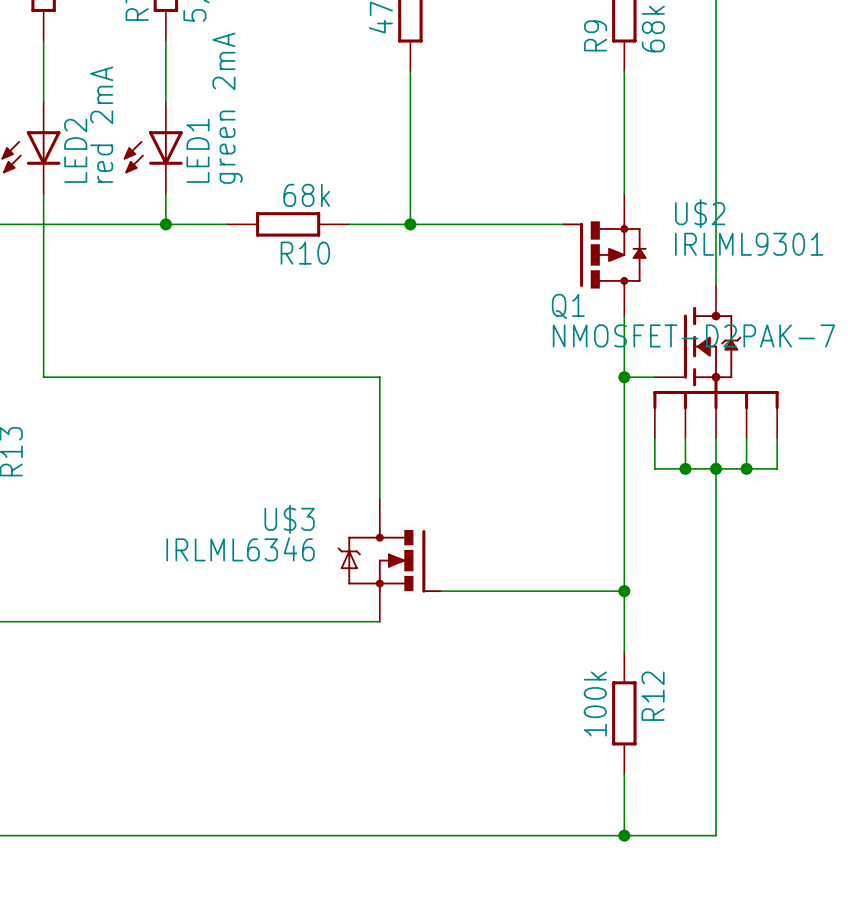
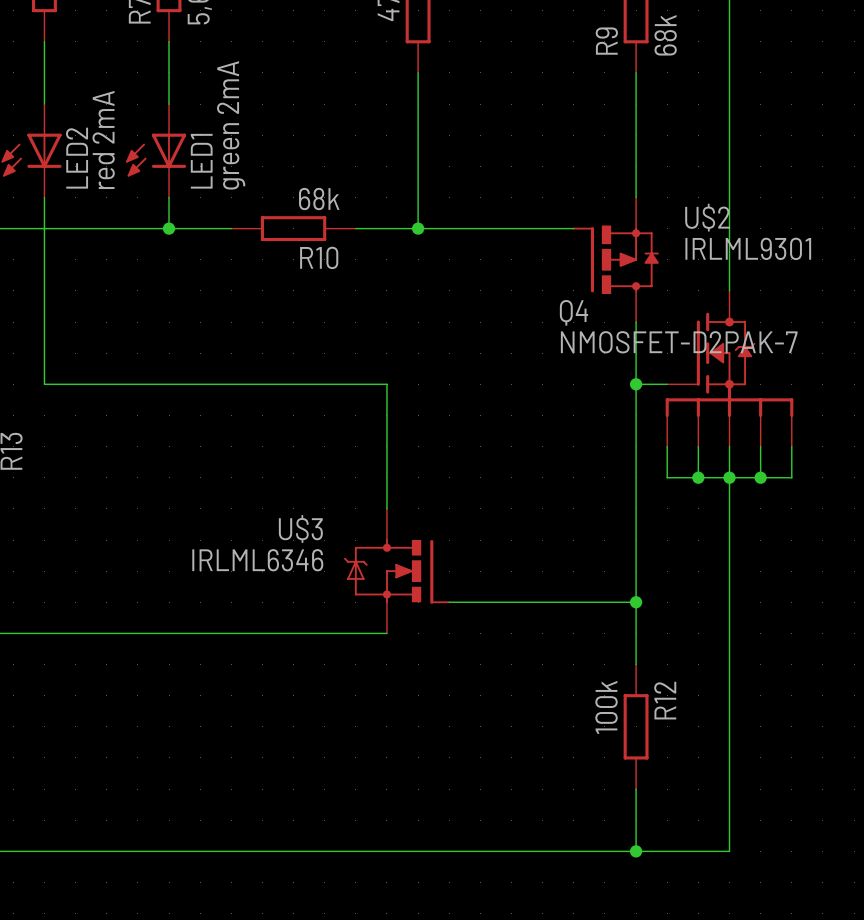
Q1 name: Q1 (568, 306) -> Q4 (573, 312)

